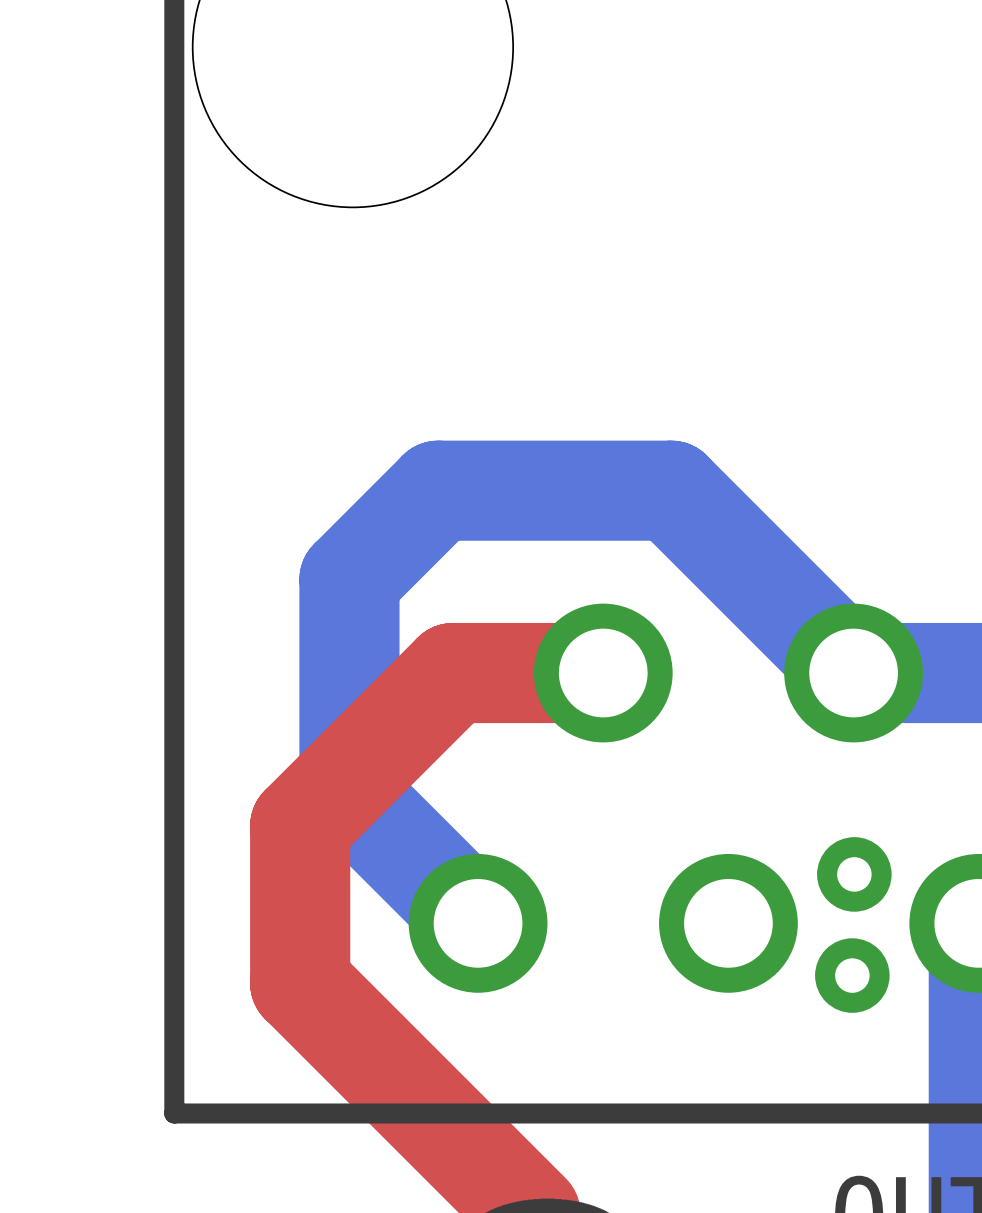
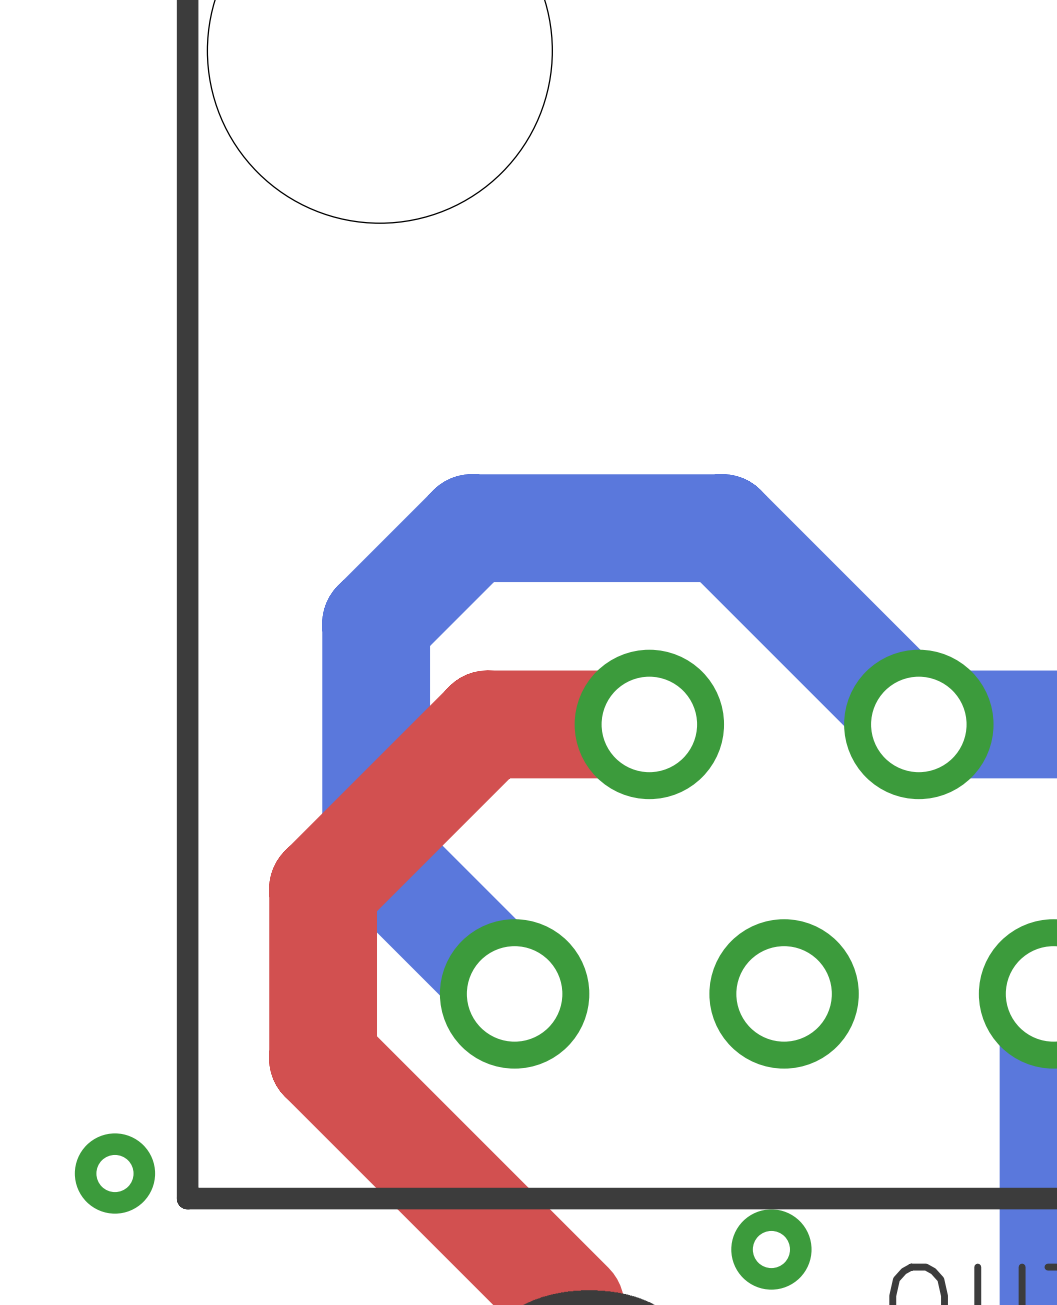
via: (854, 874) -> none
via: (852, 975) -> none
via: none -> (114, 1173)
via: none -> (771, 1249)

